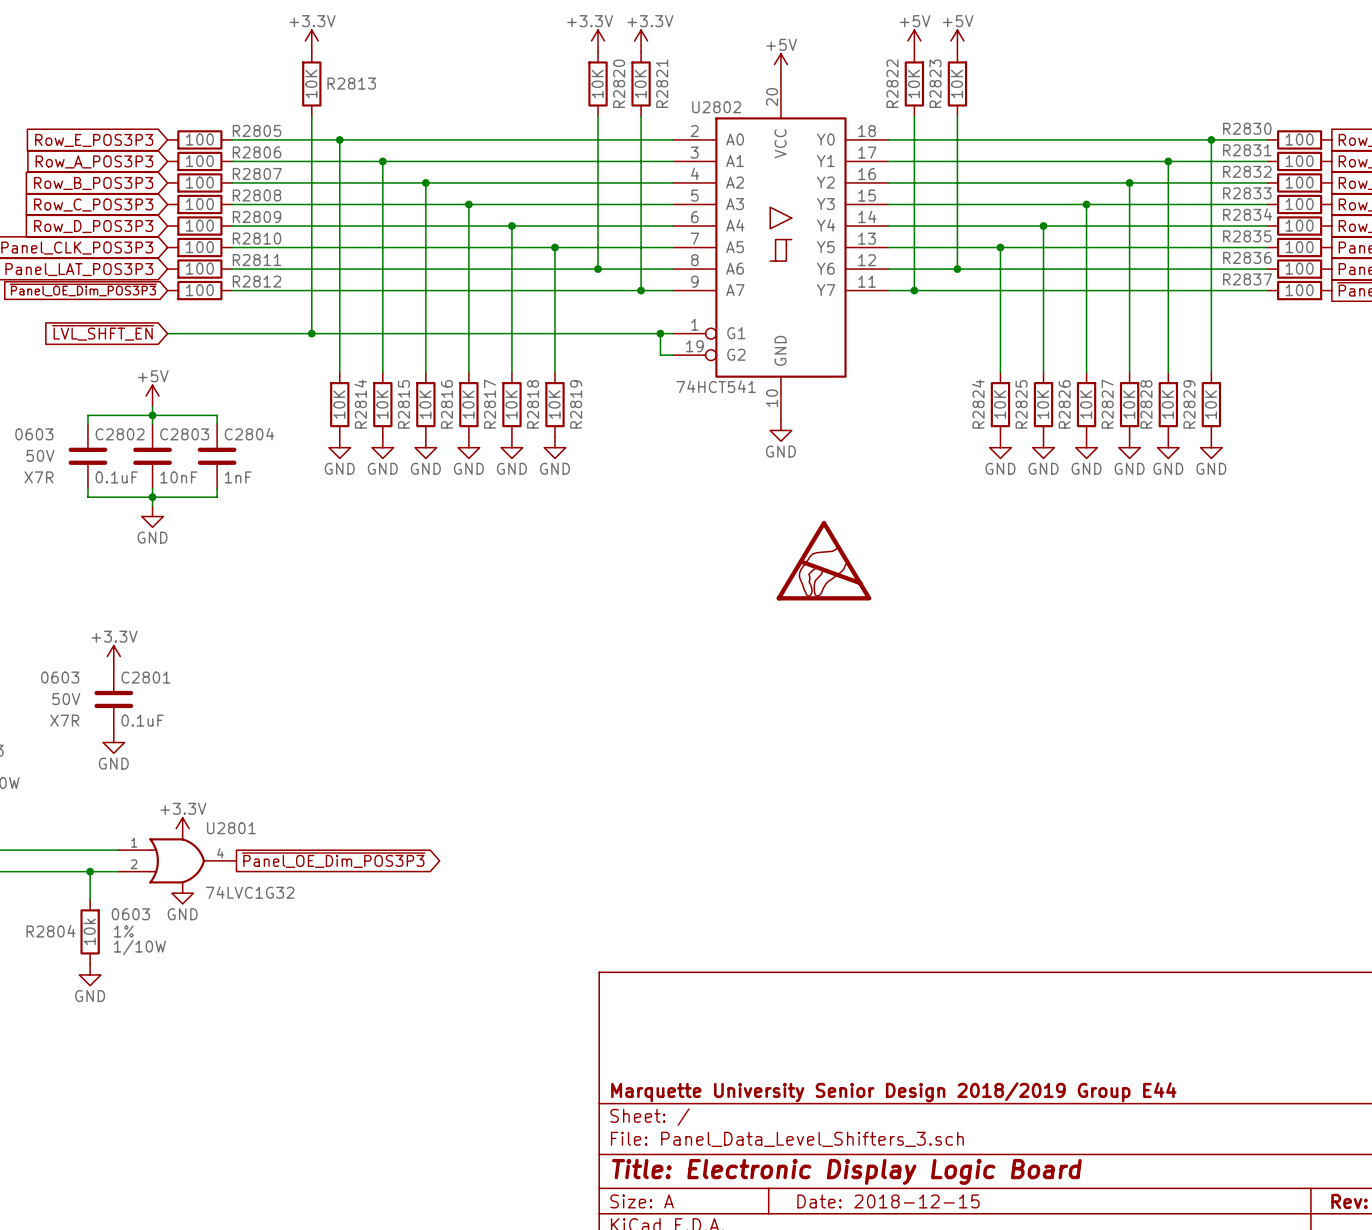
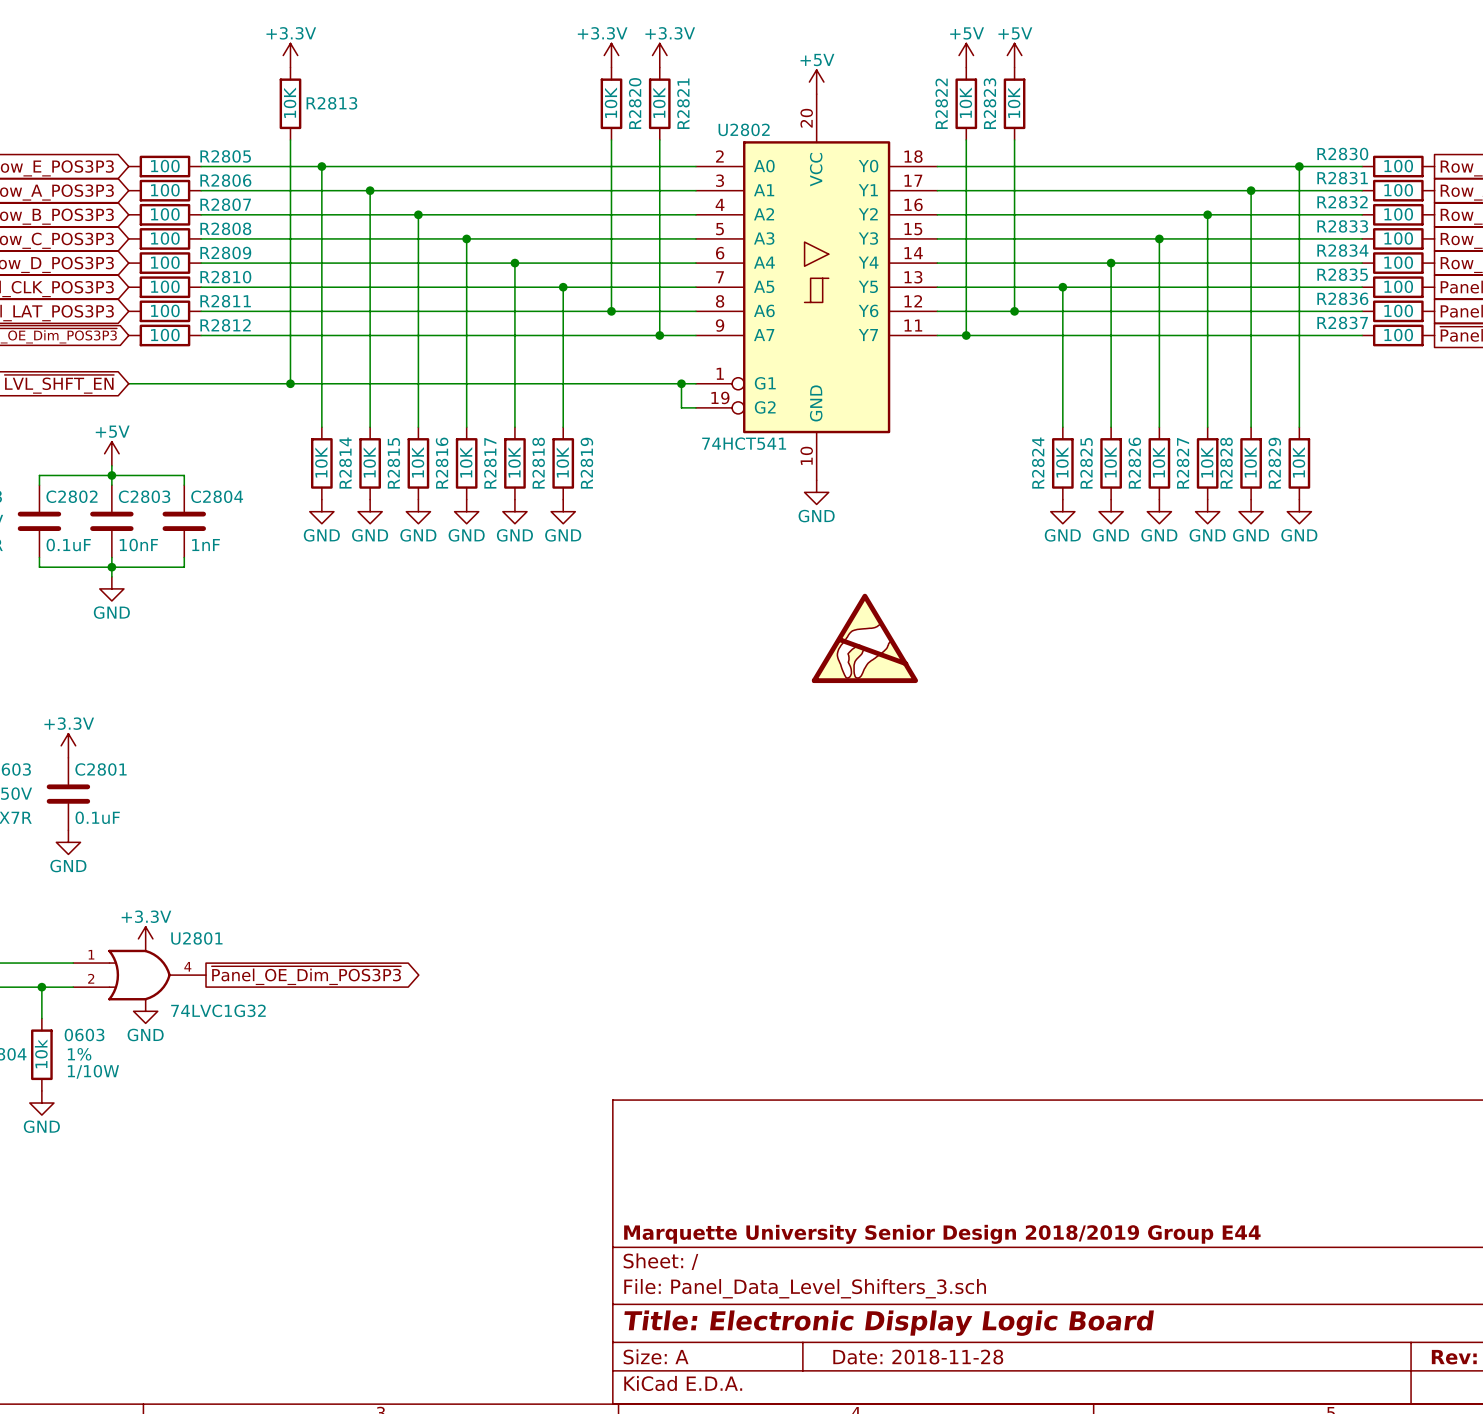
title block: Date: 2018-12-15 (888, 1201) -> Date: 2018-11-28 (918, 1357)

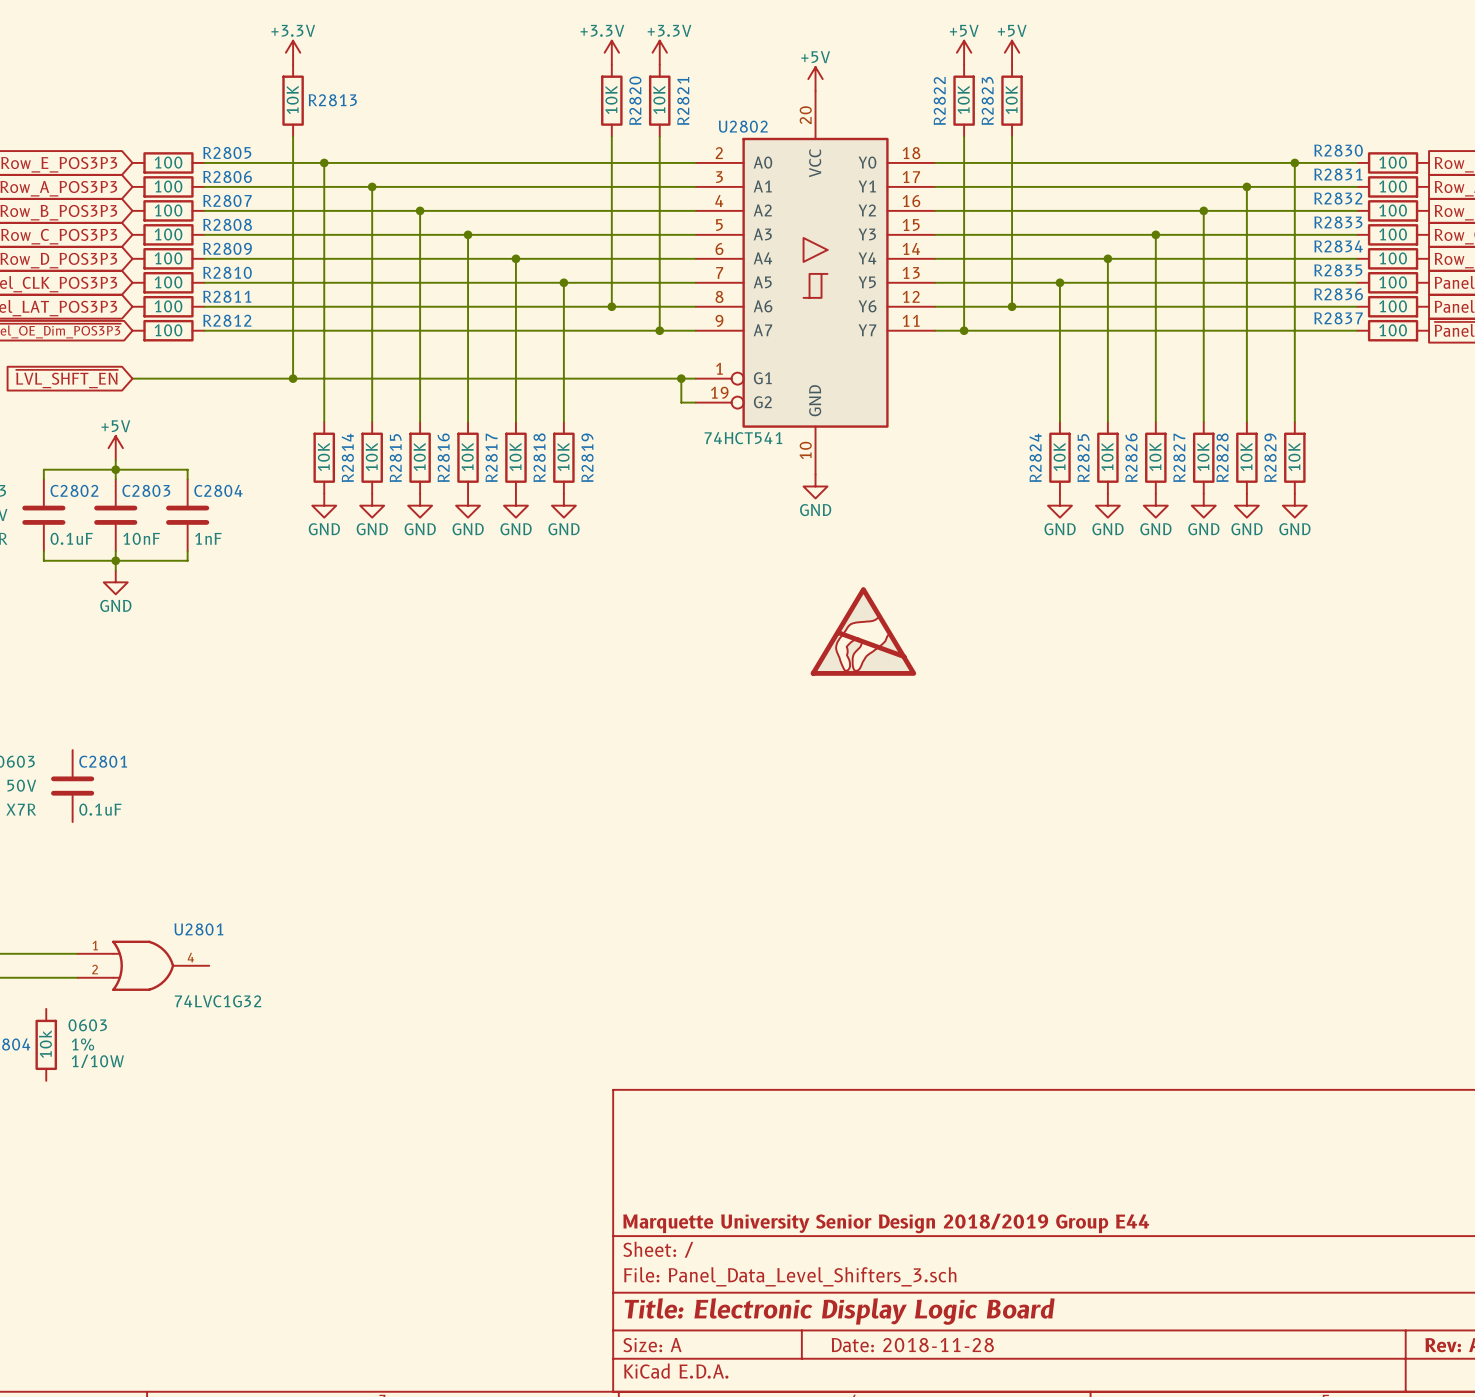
power symbol: +3.3V (68, 745) -> none
power symbol: GND (68, 842) -> none
power symbol: +3.3V (145, 938) -> none
global label: ~{Panel_OE_Dim_POS3P3} (306, 975) -> none
wire: (41, 987) (41, 1018) -> none
junction: (41, 987) -> none
power symbol: GND (145, 1011) -> none
power symbol: GND (41, 1103) -> none

